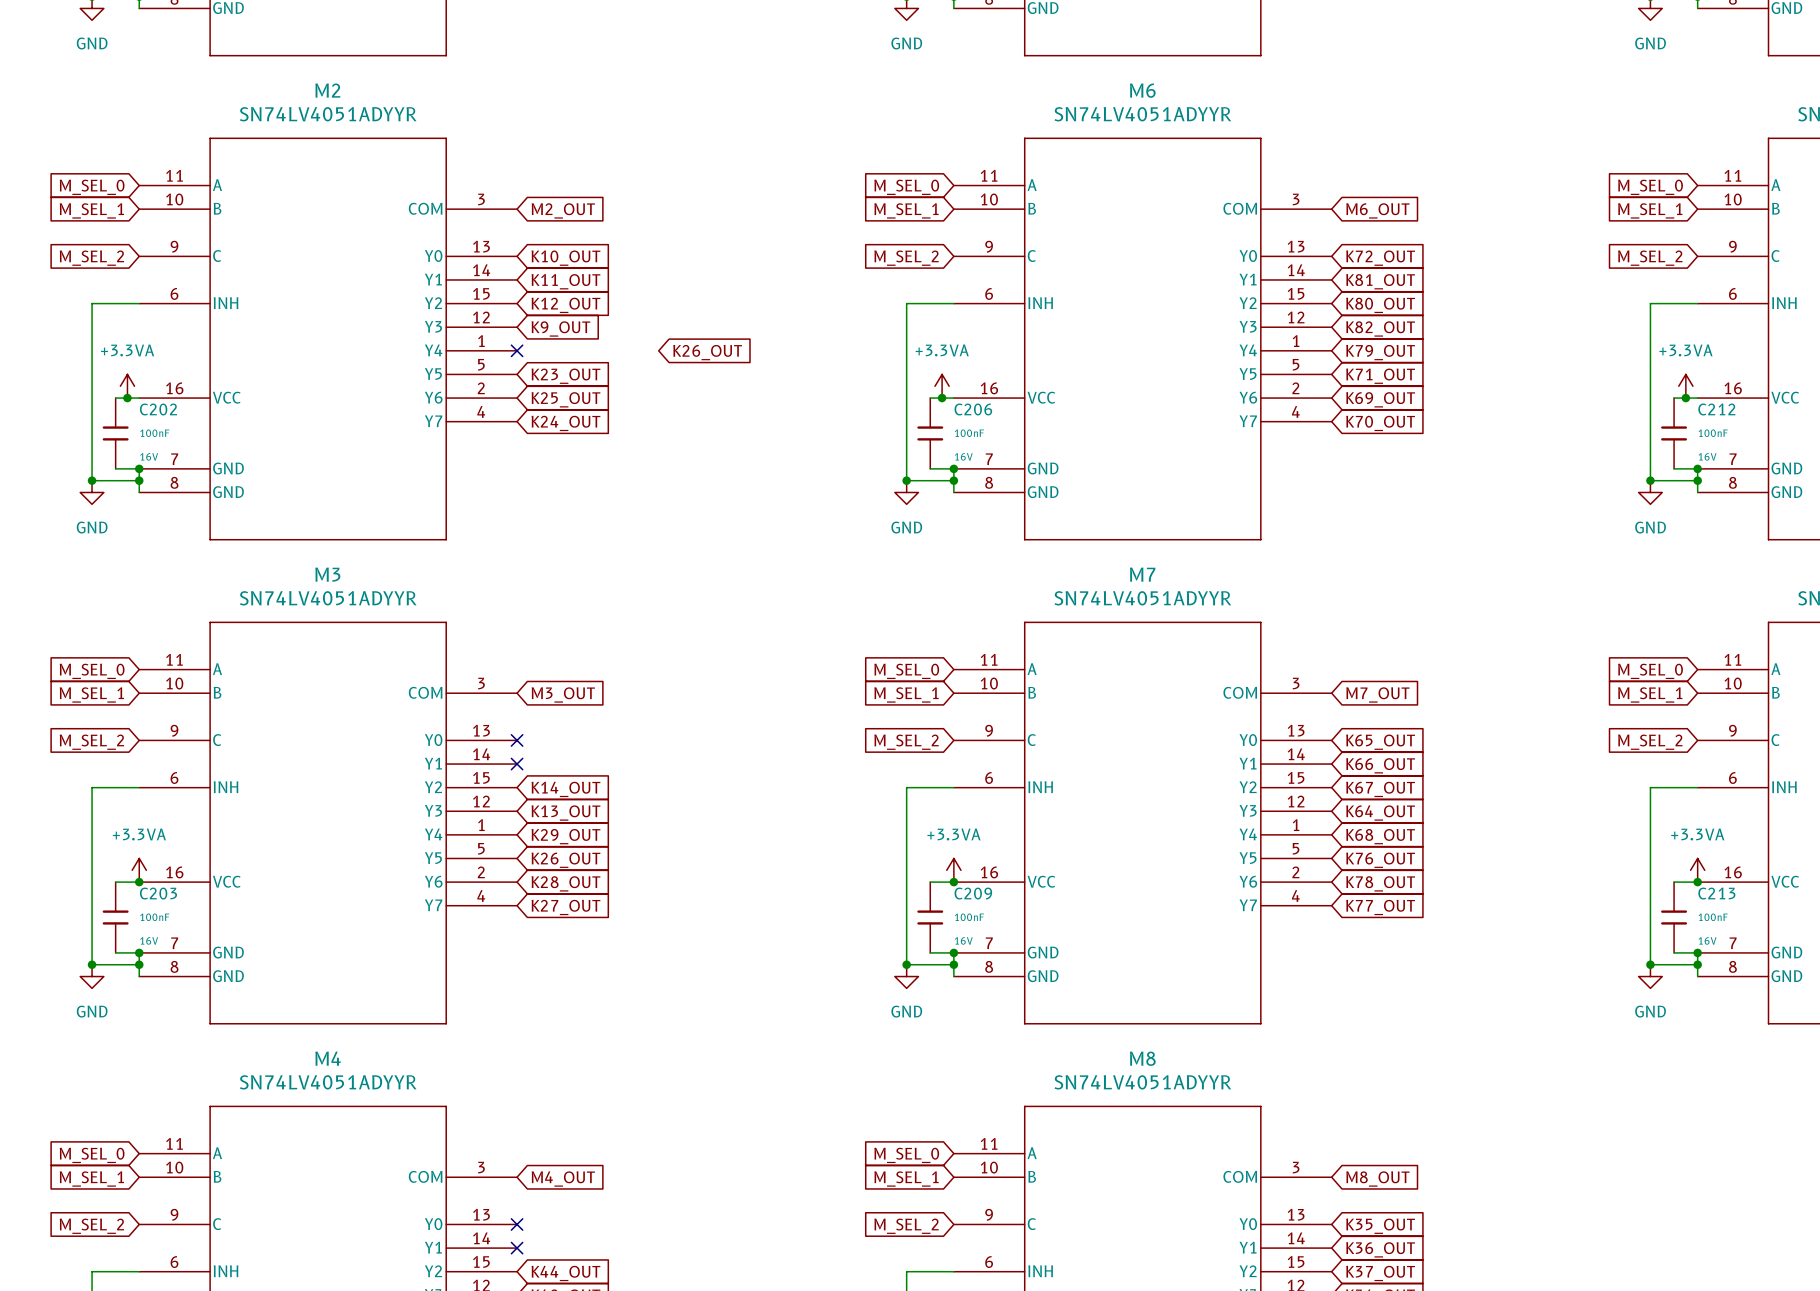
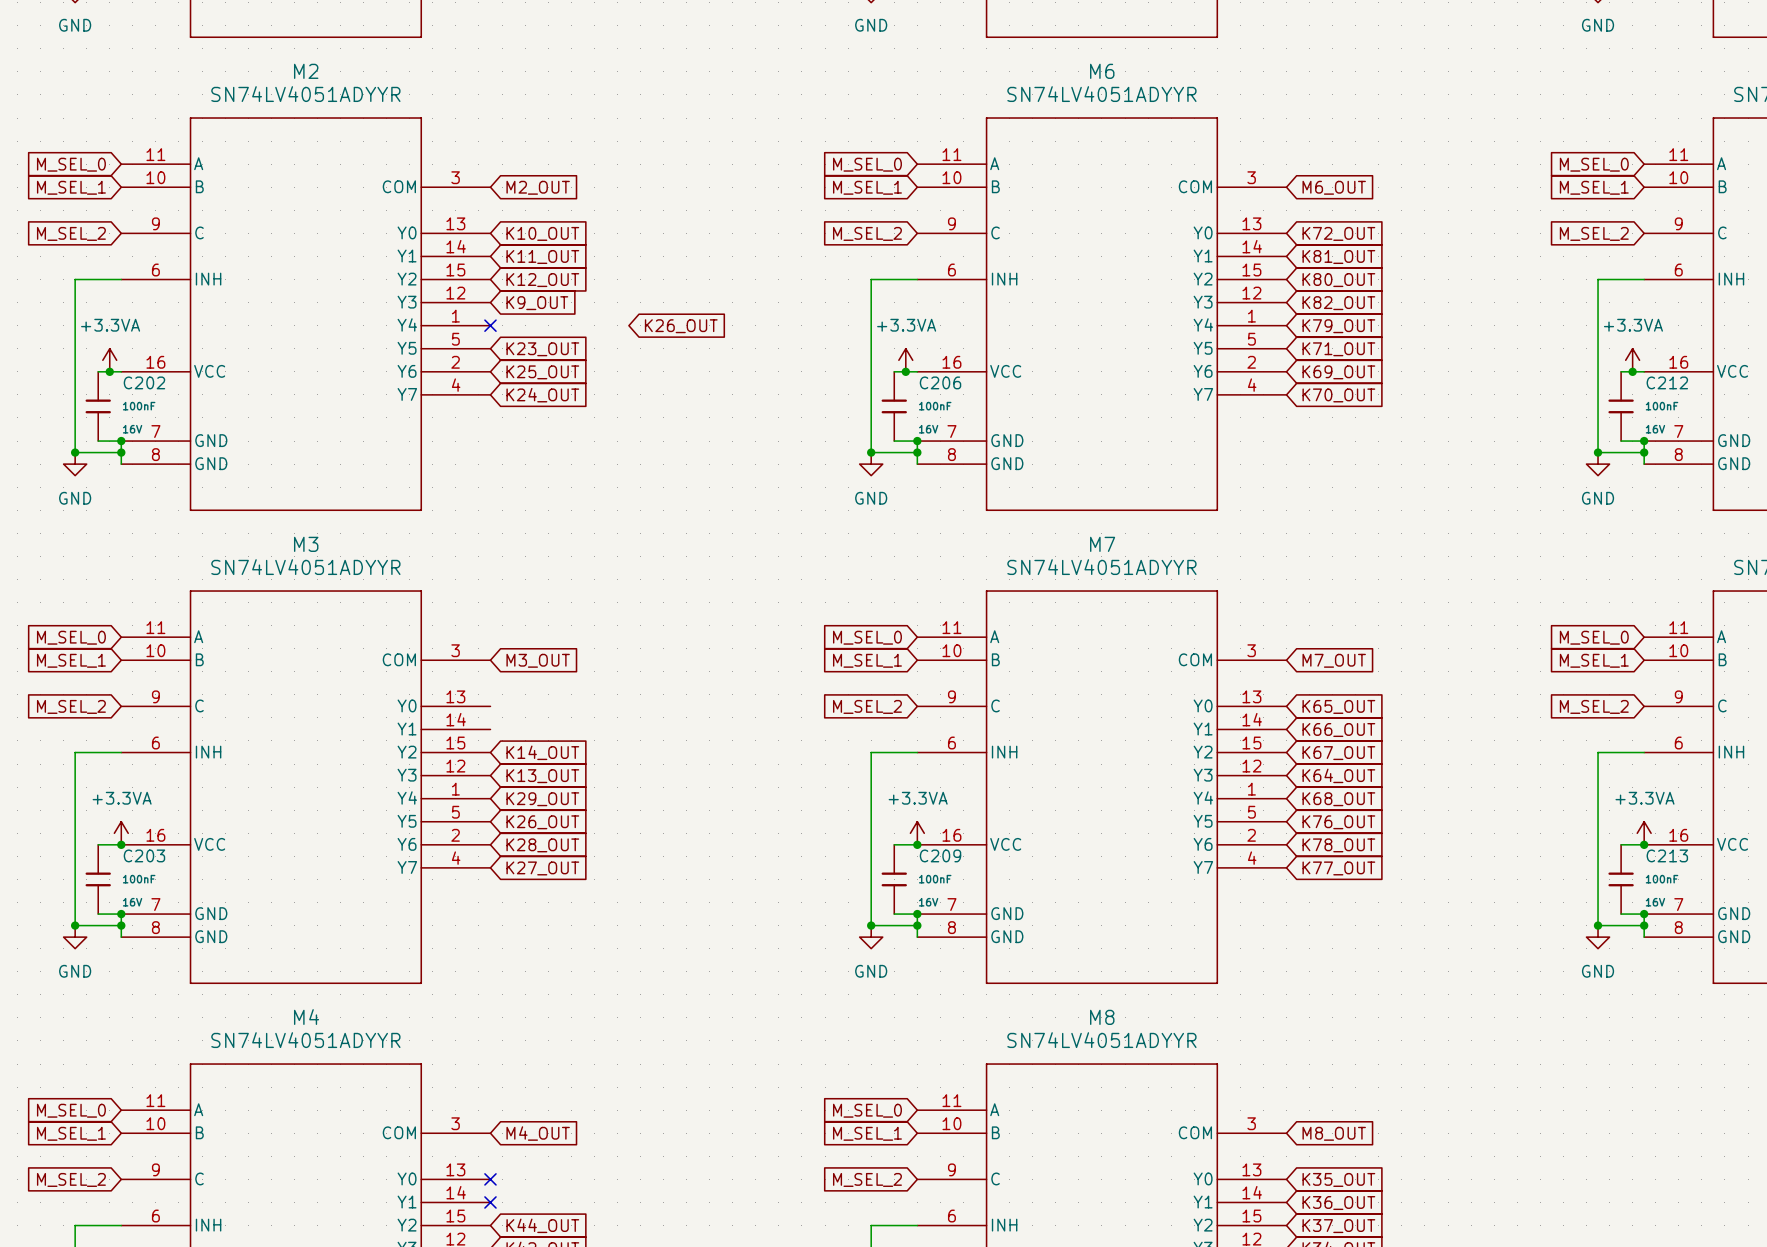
no-connect mark: (517, 740) -> none
no-connect mark: (517, 764) -> none

